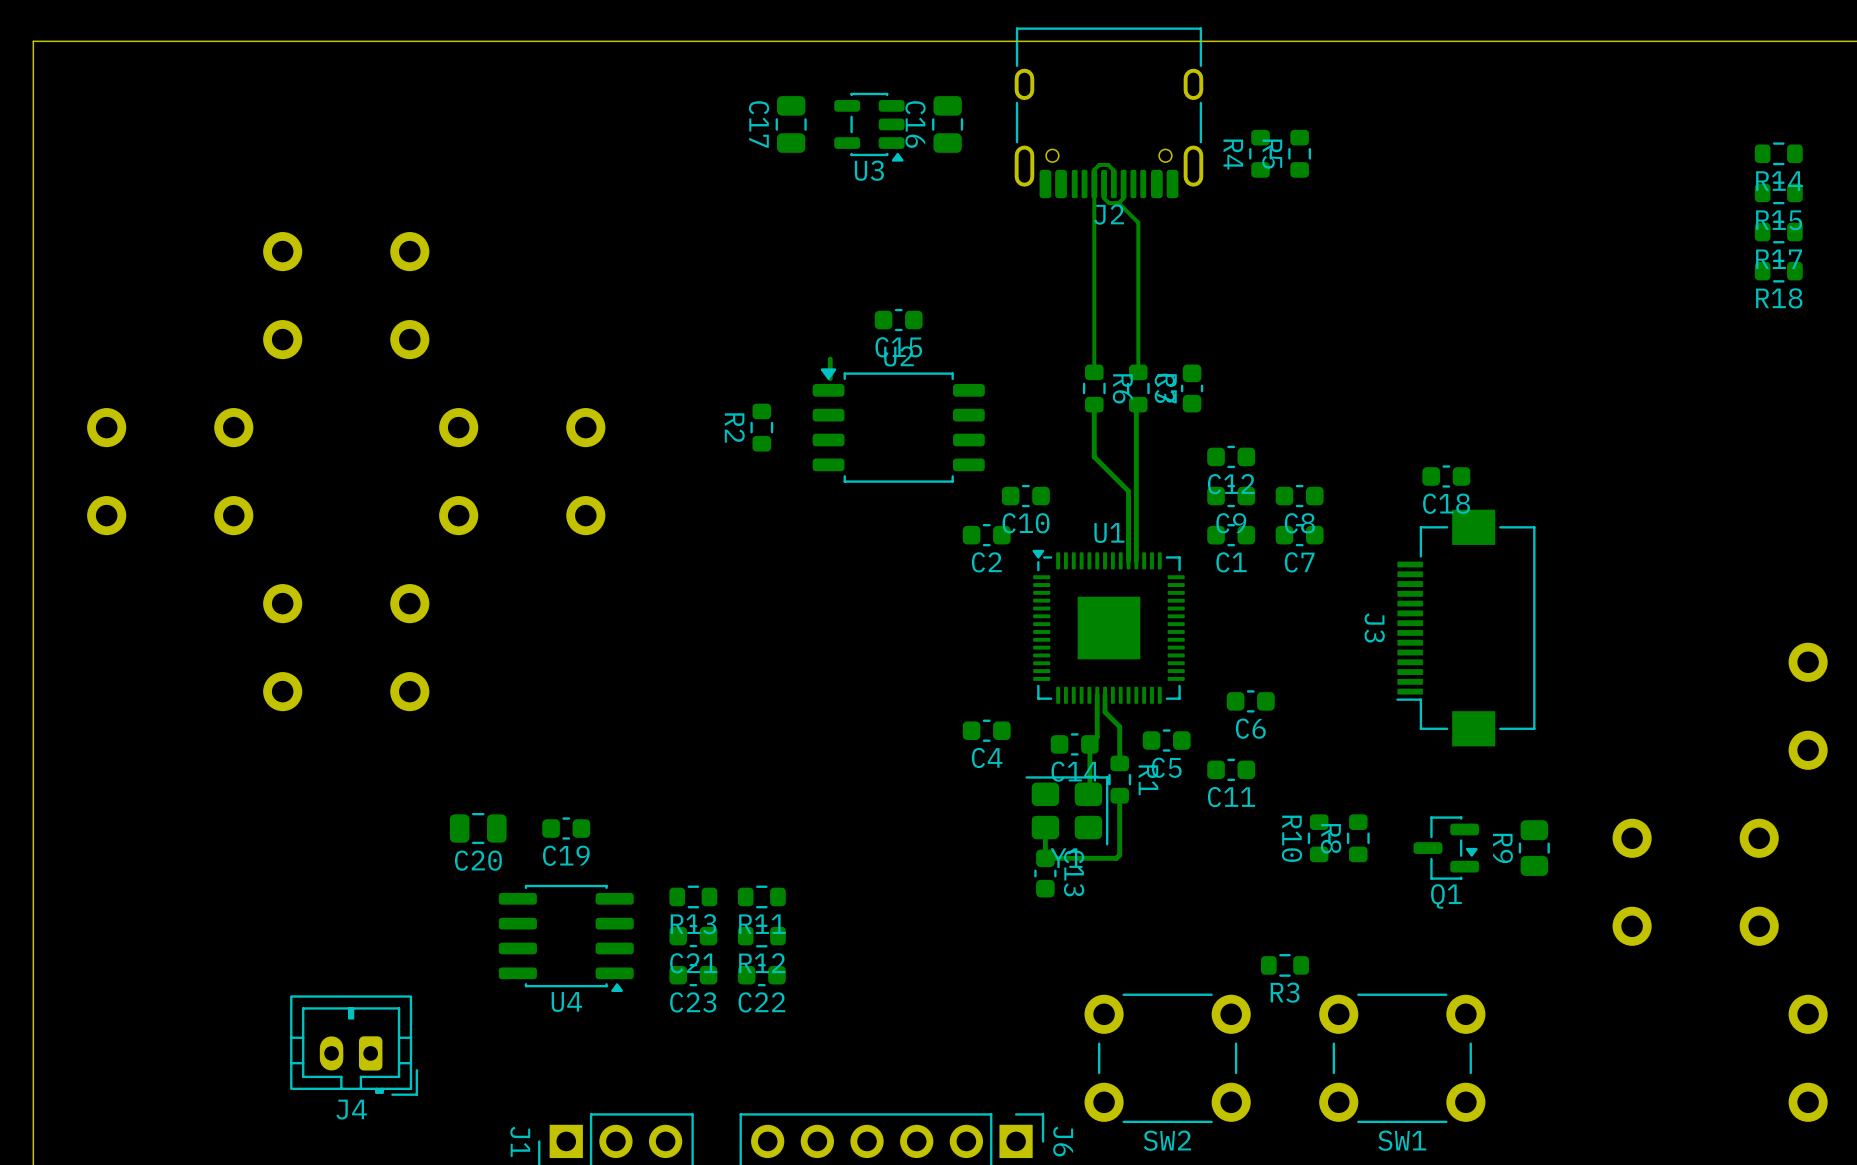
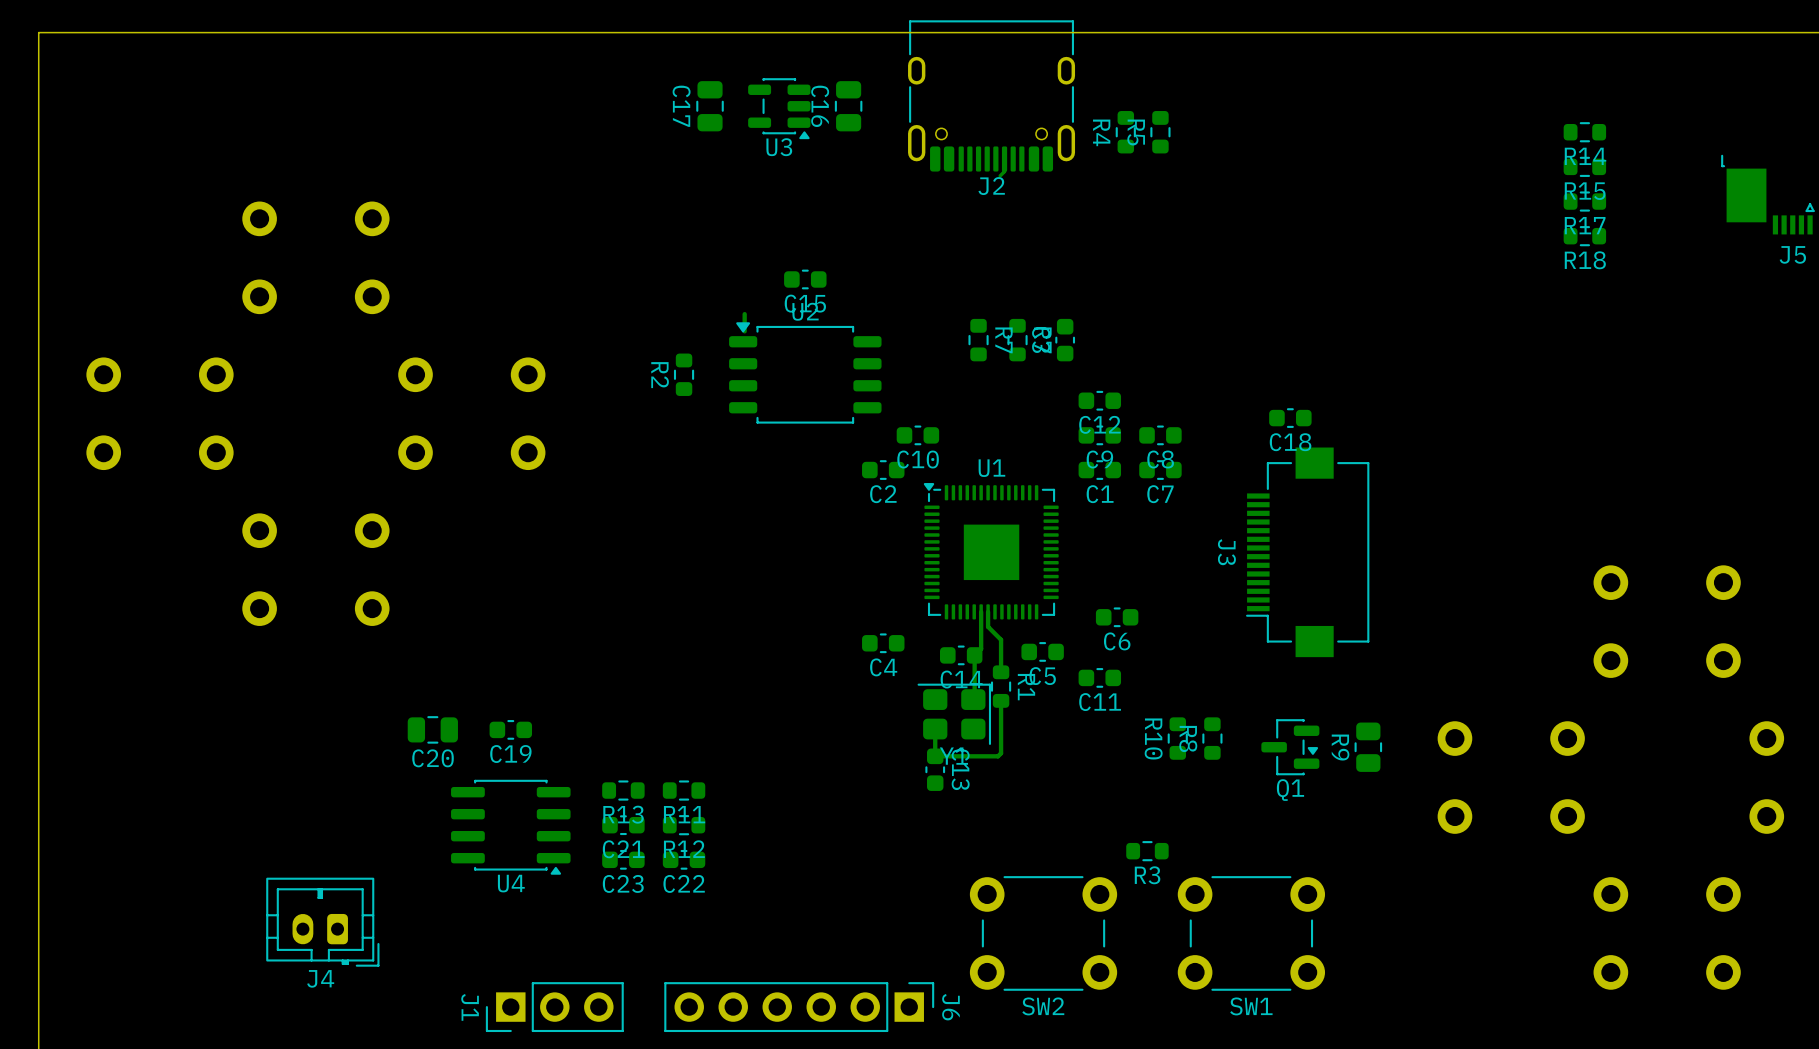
bottom track: (1104, 184) (1104, 198) (1108, 203) (1118, 203) (1138, 222) (1138, 372) -> none
bottom track: (1113, 184) (1113, 170) (1108, 164) (1099, 164) (1094, 169) (1094, 372) -> none
R6 name: R6 (1122, 388) -> R7 (1003, 340)
bottom track: (1094, 404) (1094, 456) (1128, 491) (1128, 560) -> none
bottom track: (1138, 404) (1136, 406) (1136, 560) -> none

